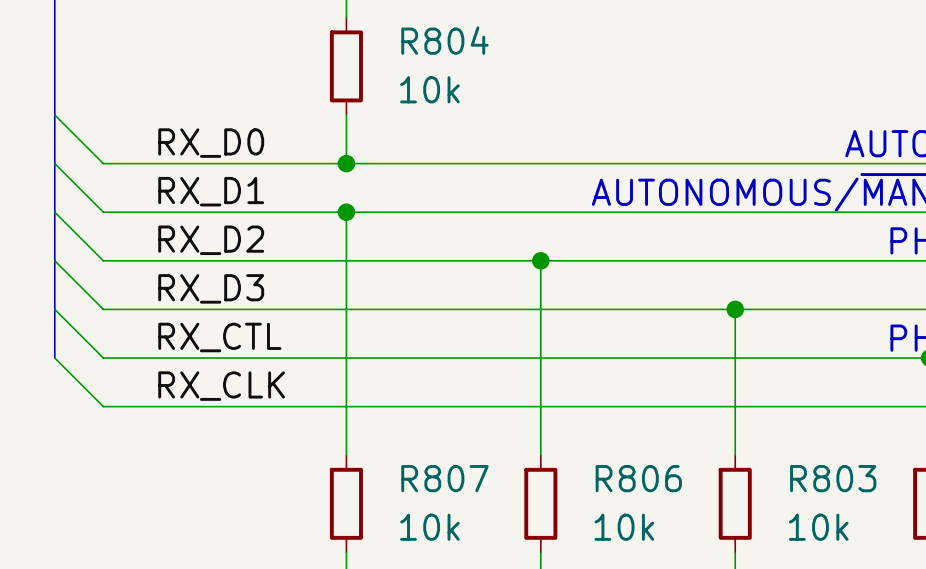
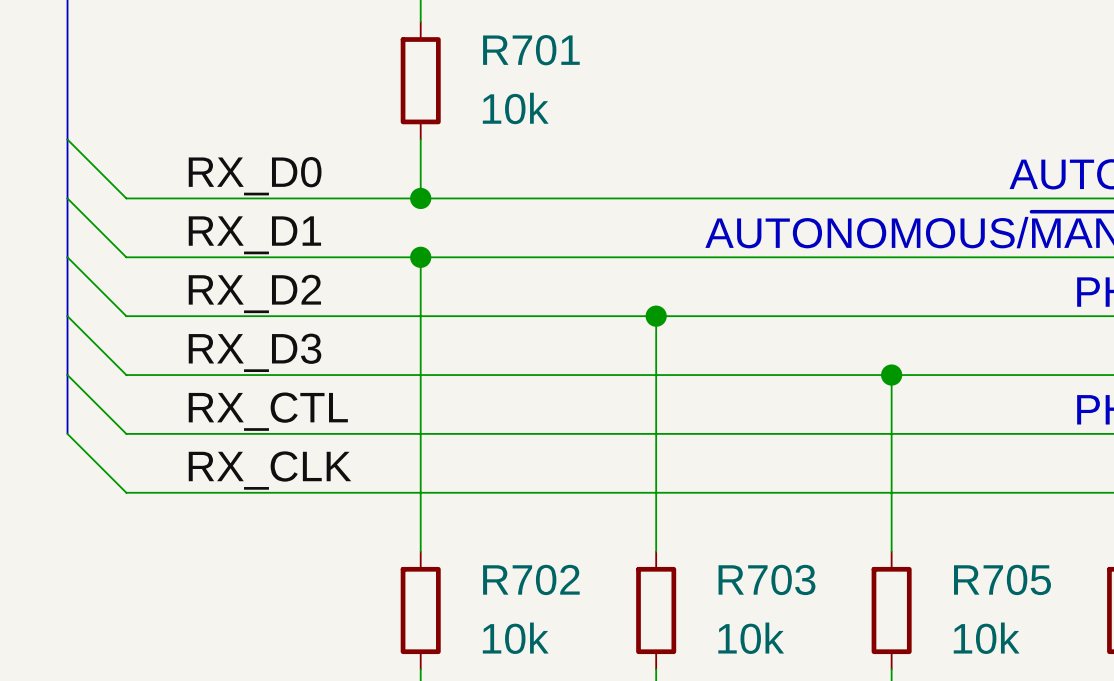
R804 name: R804 (444, 40) -> R701 (531, 50)
R807 name: R807 (444, 478) -> R702 (531, 579)
R806 name: R806 (638, 478) -> R703 (766, 579)
R803 name: R803 (833, 478) -> R705 (1002, 579)

